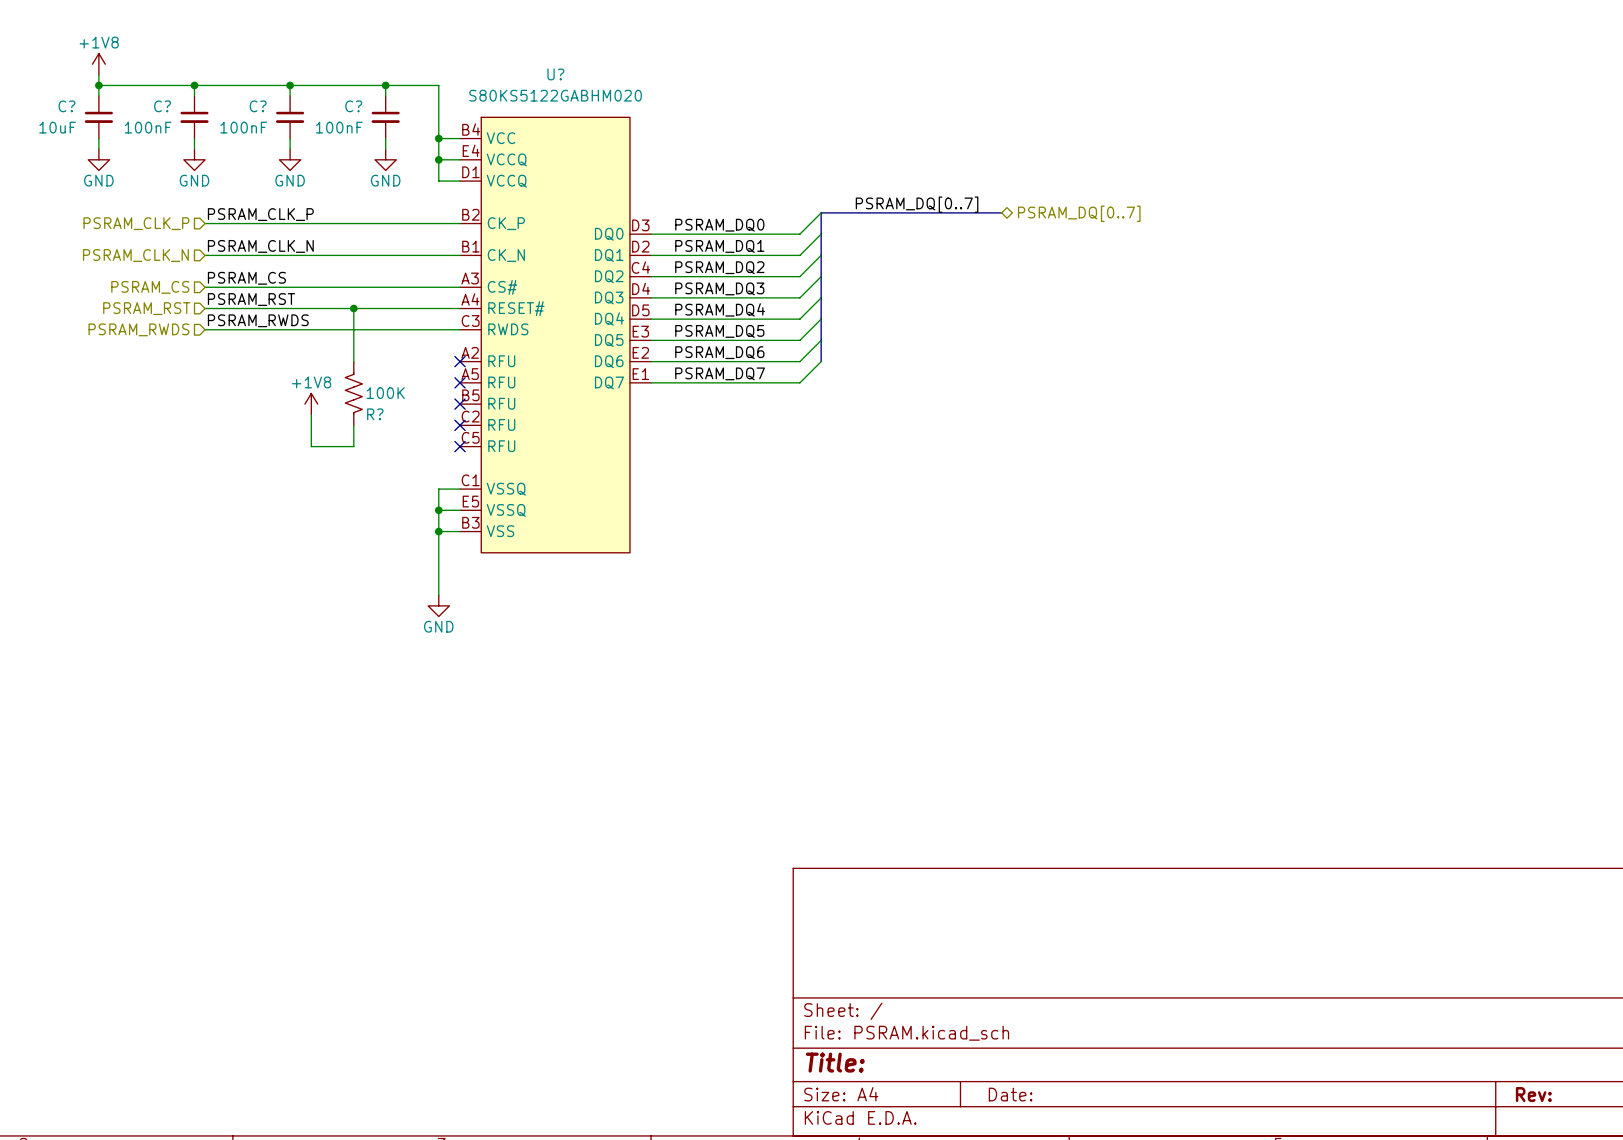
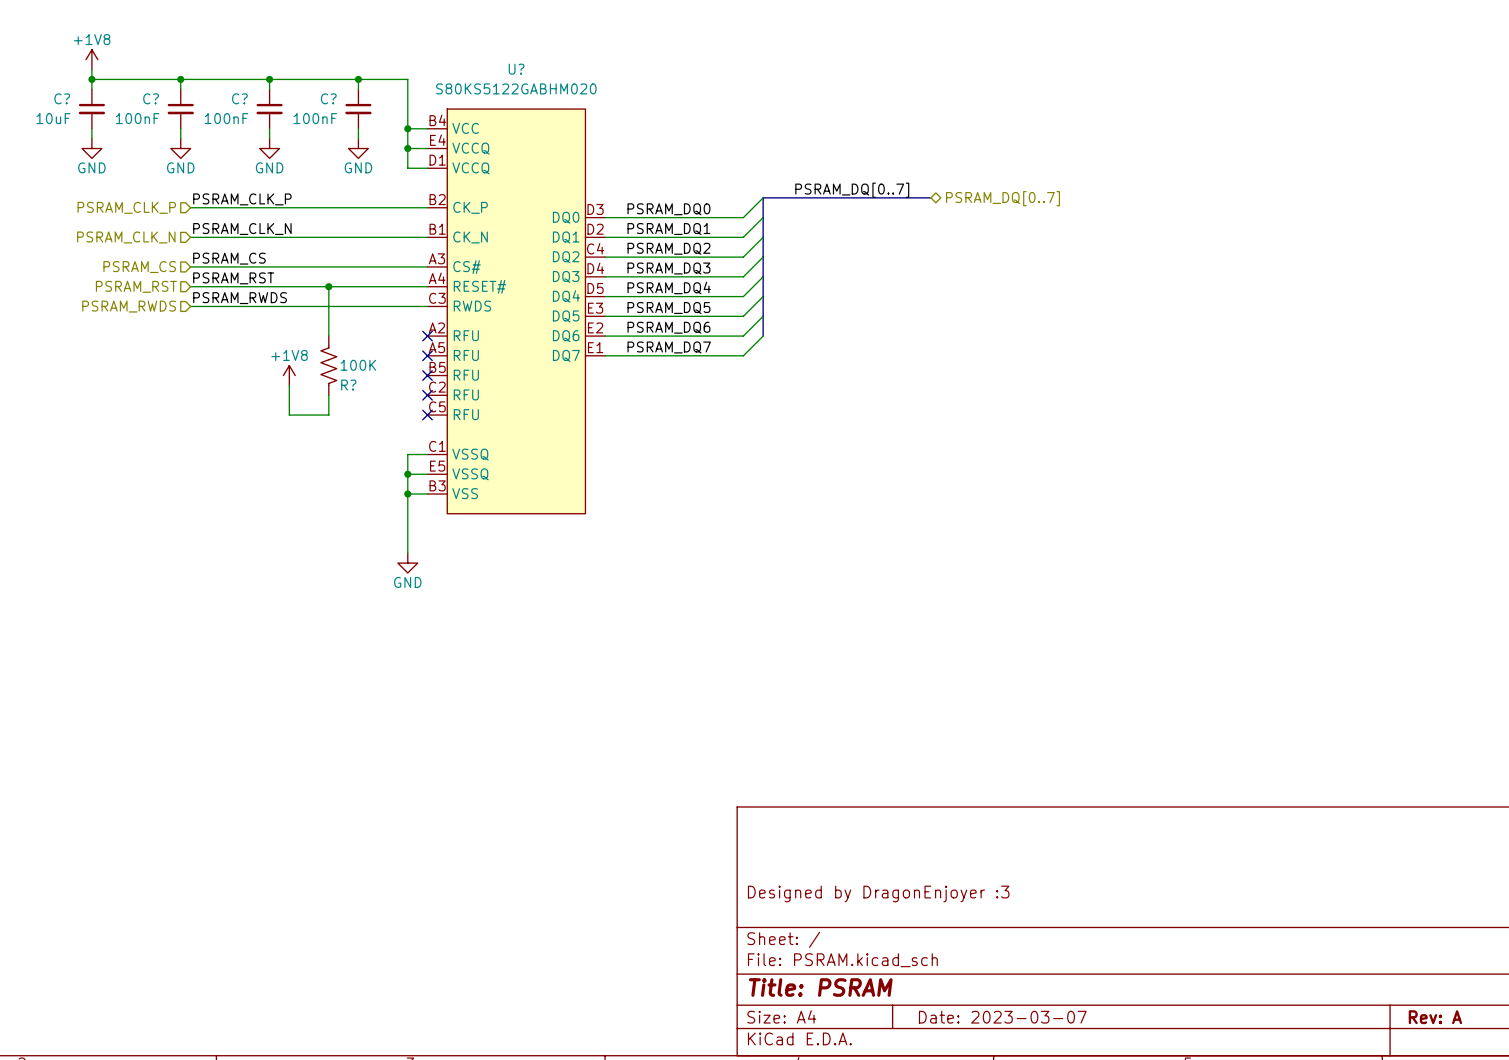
title block: none -> Designed by DragonEnjoyer :3 (878, 894)
title block: Title: (835, 1062) -> Title: PSRAM (820, 987)
title block: Date: (1010, 1094) -> Date: 2023-03-07 (1002, 1017)
title block: Rev: (1533, 1094) -> Rev: A (1435, 1017)

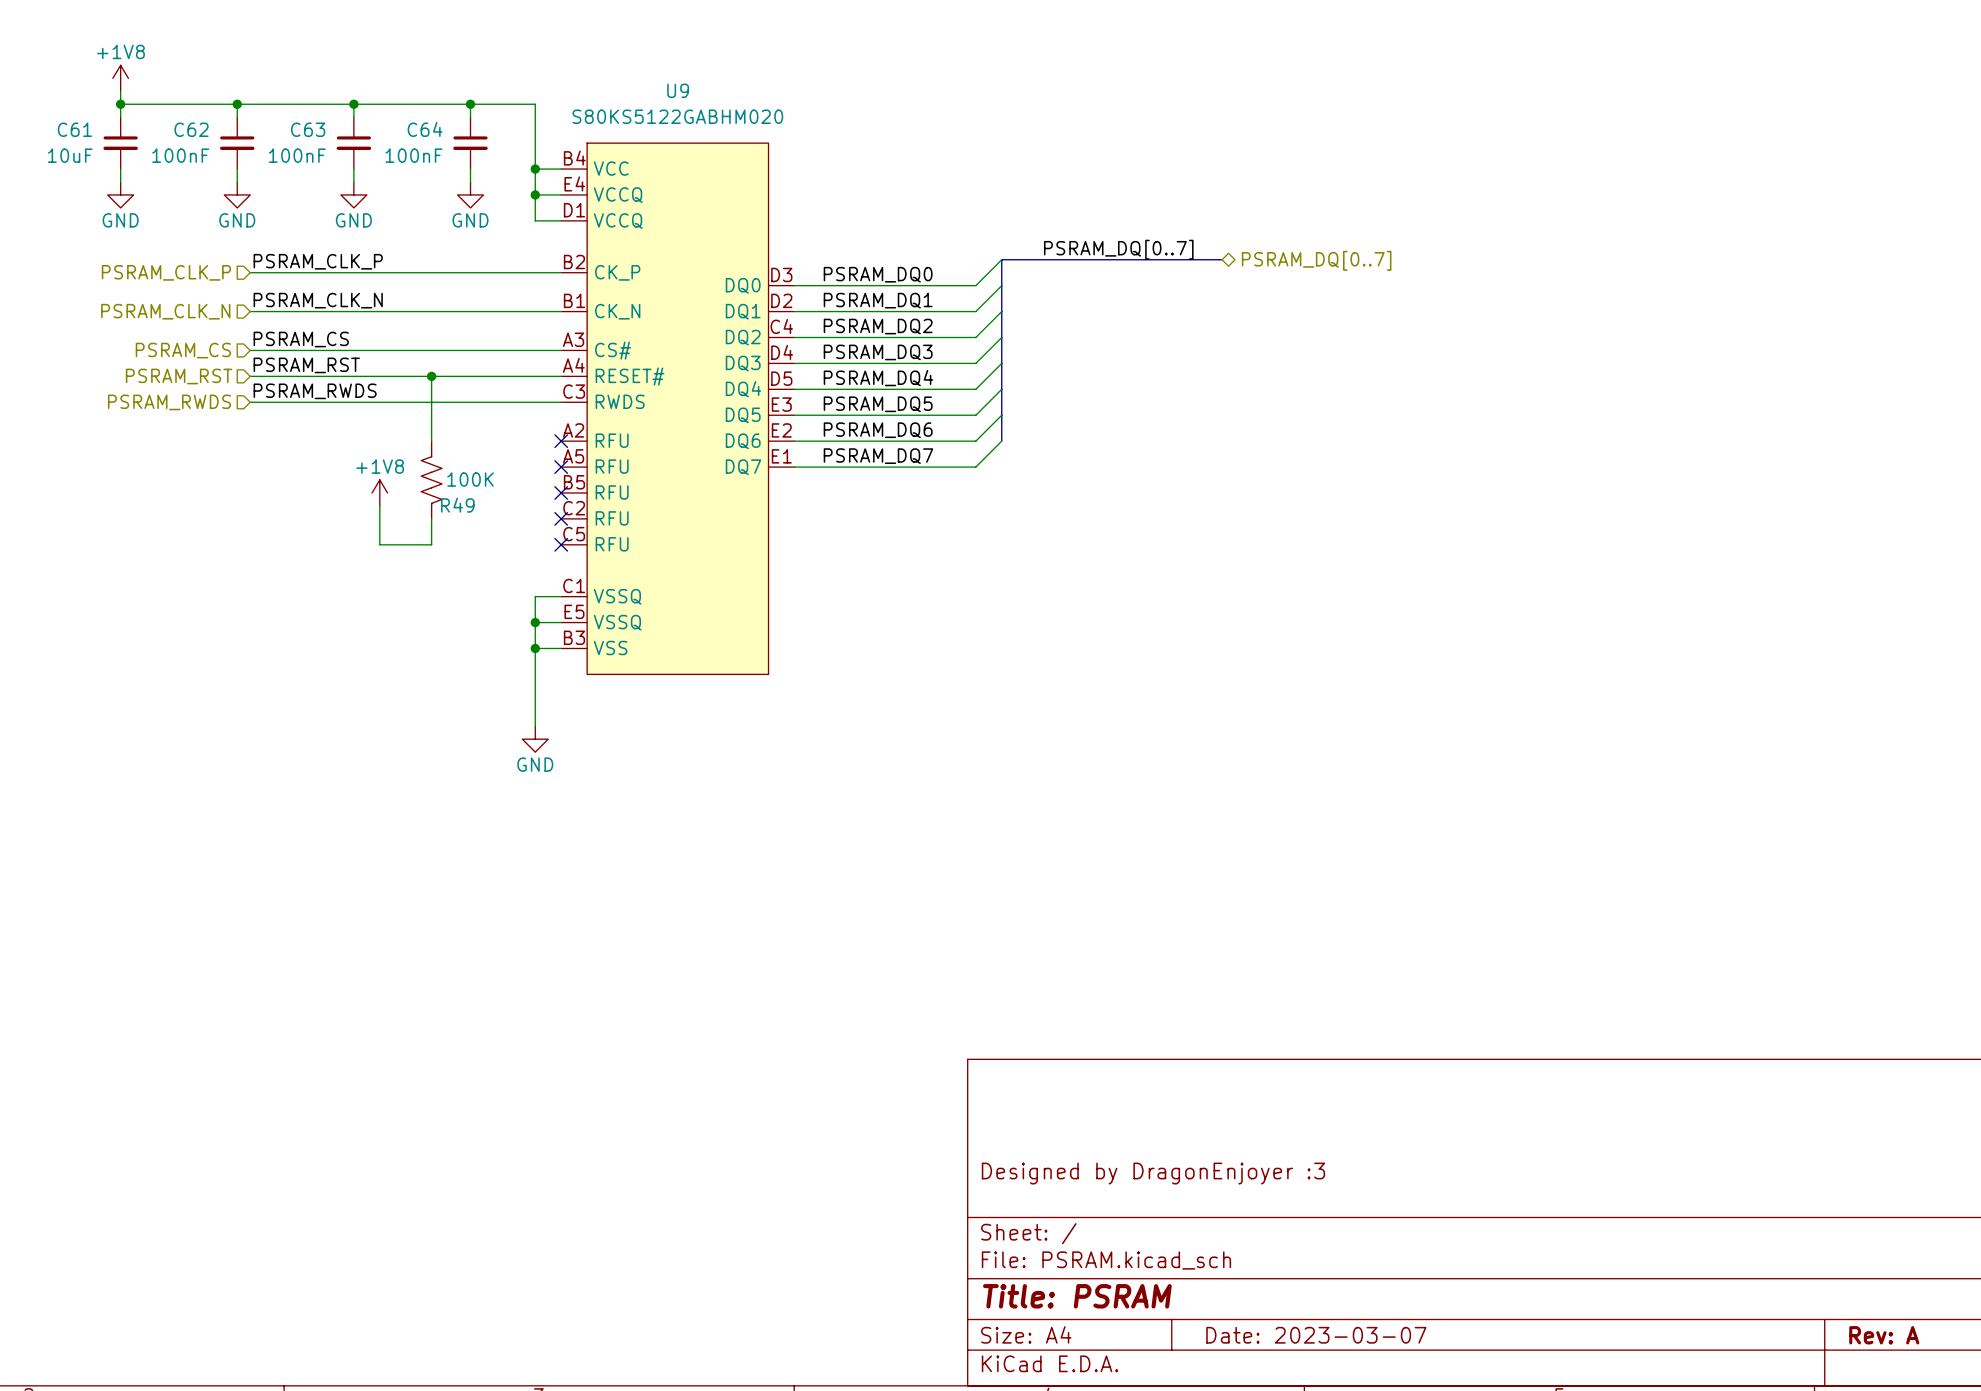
U? name: U? (516, 69) -> U9 (678, 90)
C? name: C? (62, 98) -> C61 (74, 129)
C? name: C? (151, 98) -> C62 (191, 129)
C? name: C? (239, 98) -> C63 (308, 129)
C? name: C? (328, 98) -> C64 (425, 129)
R? name: R? (348, 385) -> R49 (457, 505)

